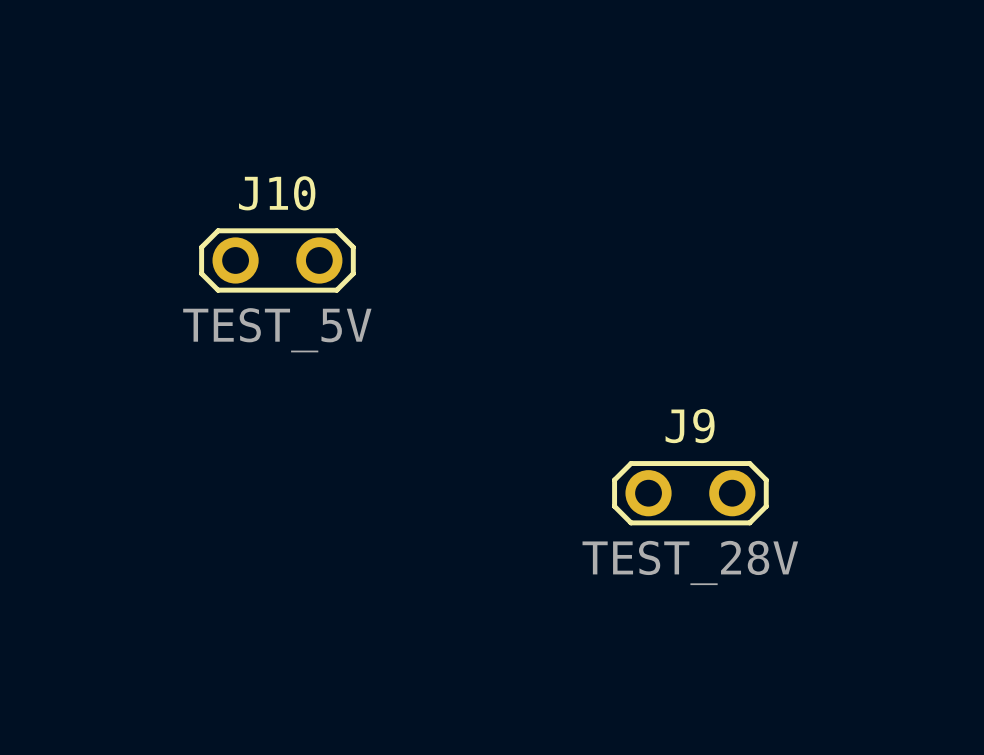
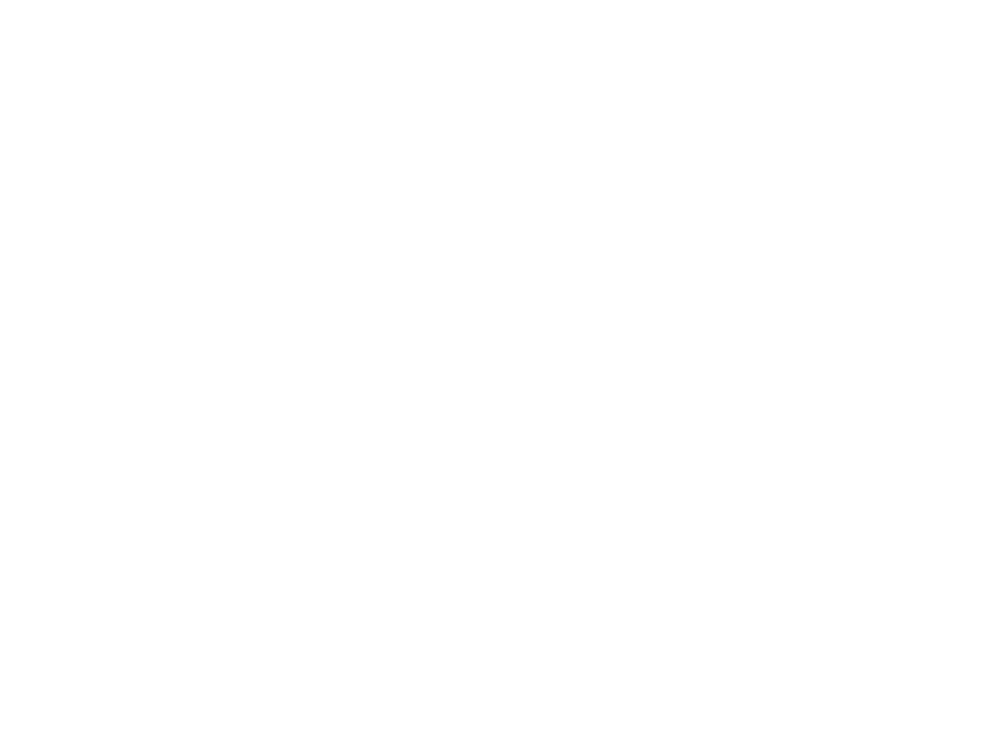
J10: TEST_5V (277, 260) -> none
J9: TEST_28V (690, 493) -> none

